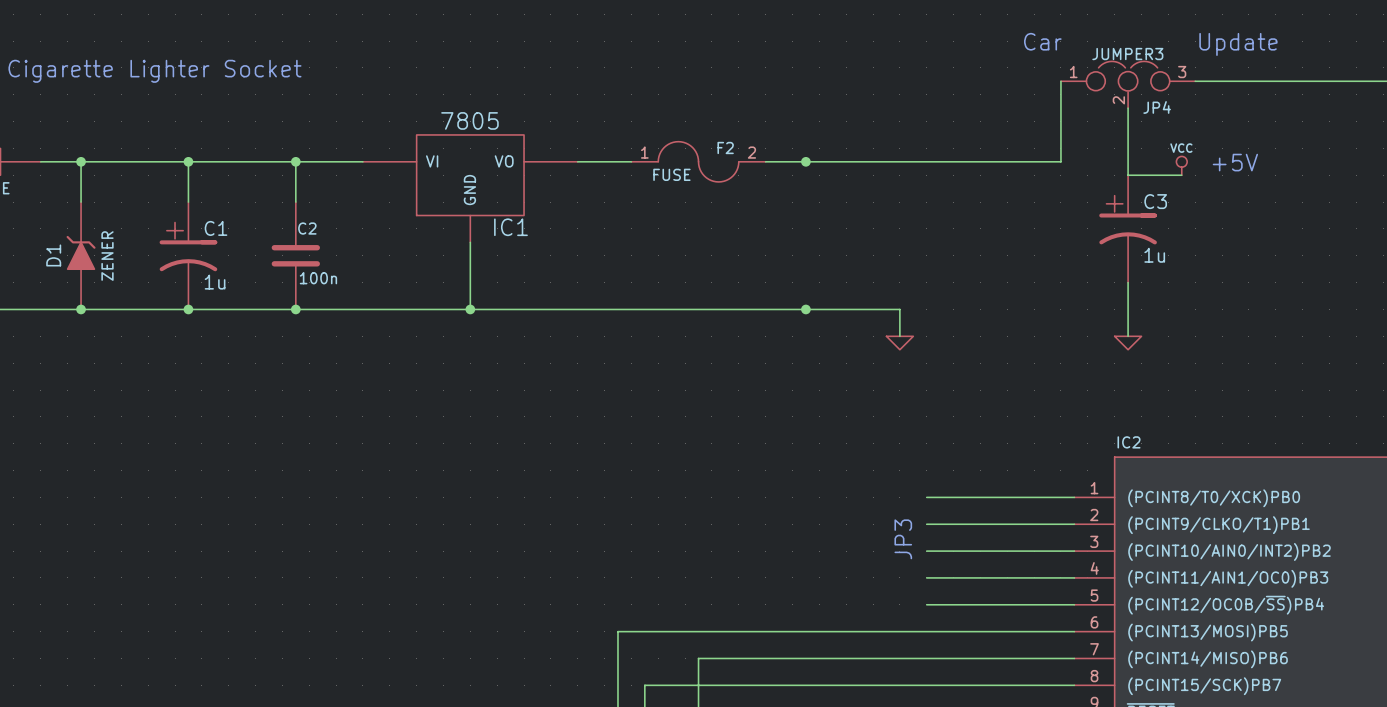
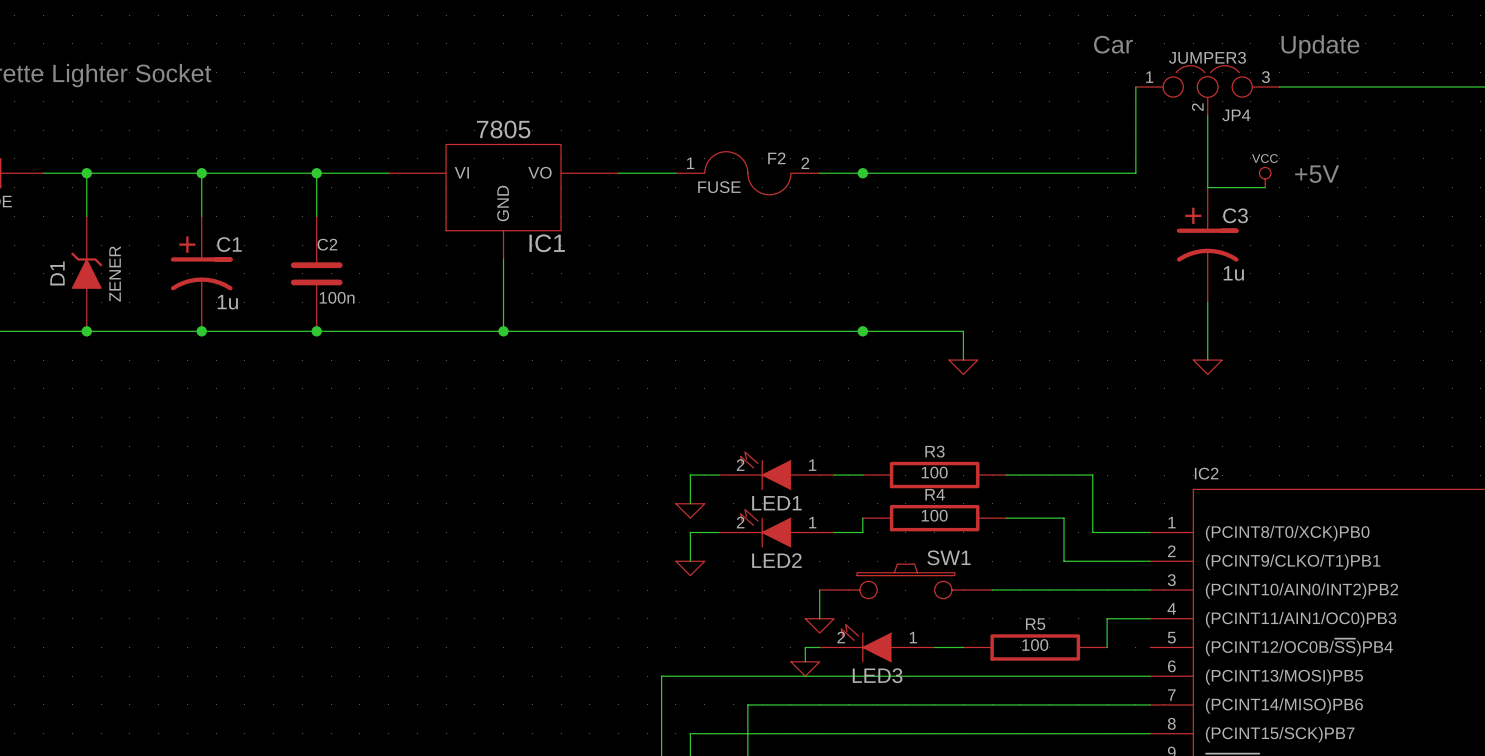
LED1: none -> (776, 470)
wire: none -> (719, 475) (690, 475) (690, 503)
wire: none -> (834, 475) (862, 475)
R3: none -> 100 (934, 475)
power symbol: none -> (690, 510)
wire: none -> (862, 518) (862, 532) (834, 532)
R4: none -> 100 (934, 518)
LED2: none -> (776, 528)
wire: none -> (719, 532) (690, 532) (690, 561)
wire: (926, 497) (1020, 497) -> (1006, 475) (1092, 475) (1092, 532)
wire: (926, 524) (993, 524) -> (1006, 518) (1064, 518) (1064, 561)
power symbol: none -> (690, 568)
text: JP3 (903, 539) -> none
SW1: none -> (905, 581)
wire: none -> (819, 590) (819, 618)
wire: (926, 577) (1034, 577) -> (1107, 647) (1107, 618)
power symbol: none -> (819, 625)
LED3: none -> (877, 643)
wire: none -> (819, 647) (805, 647) (805, 661)
wire: none -> (934, 647) (963, 647)
wire: (926, 604) (1074, 604) -> none
R5: none -> 100 (1035, 647)
power symbol: none -> (805, 669)

